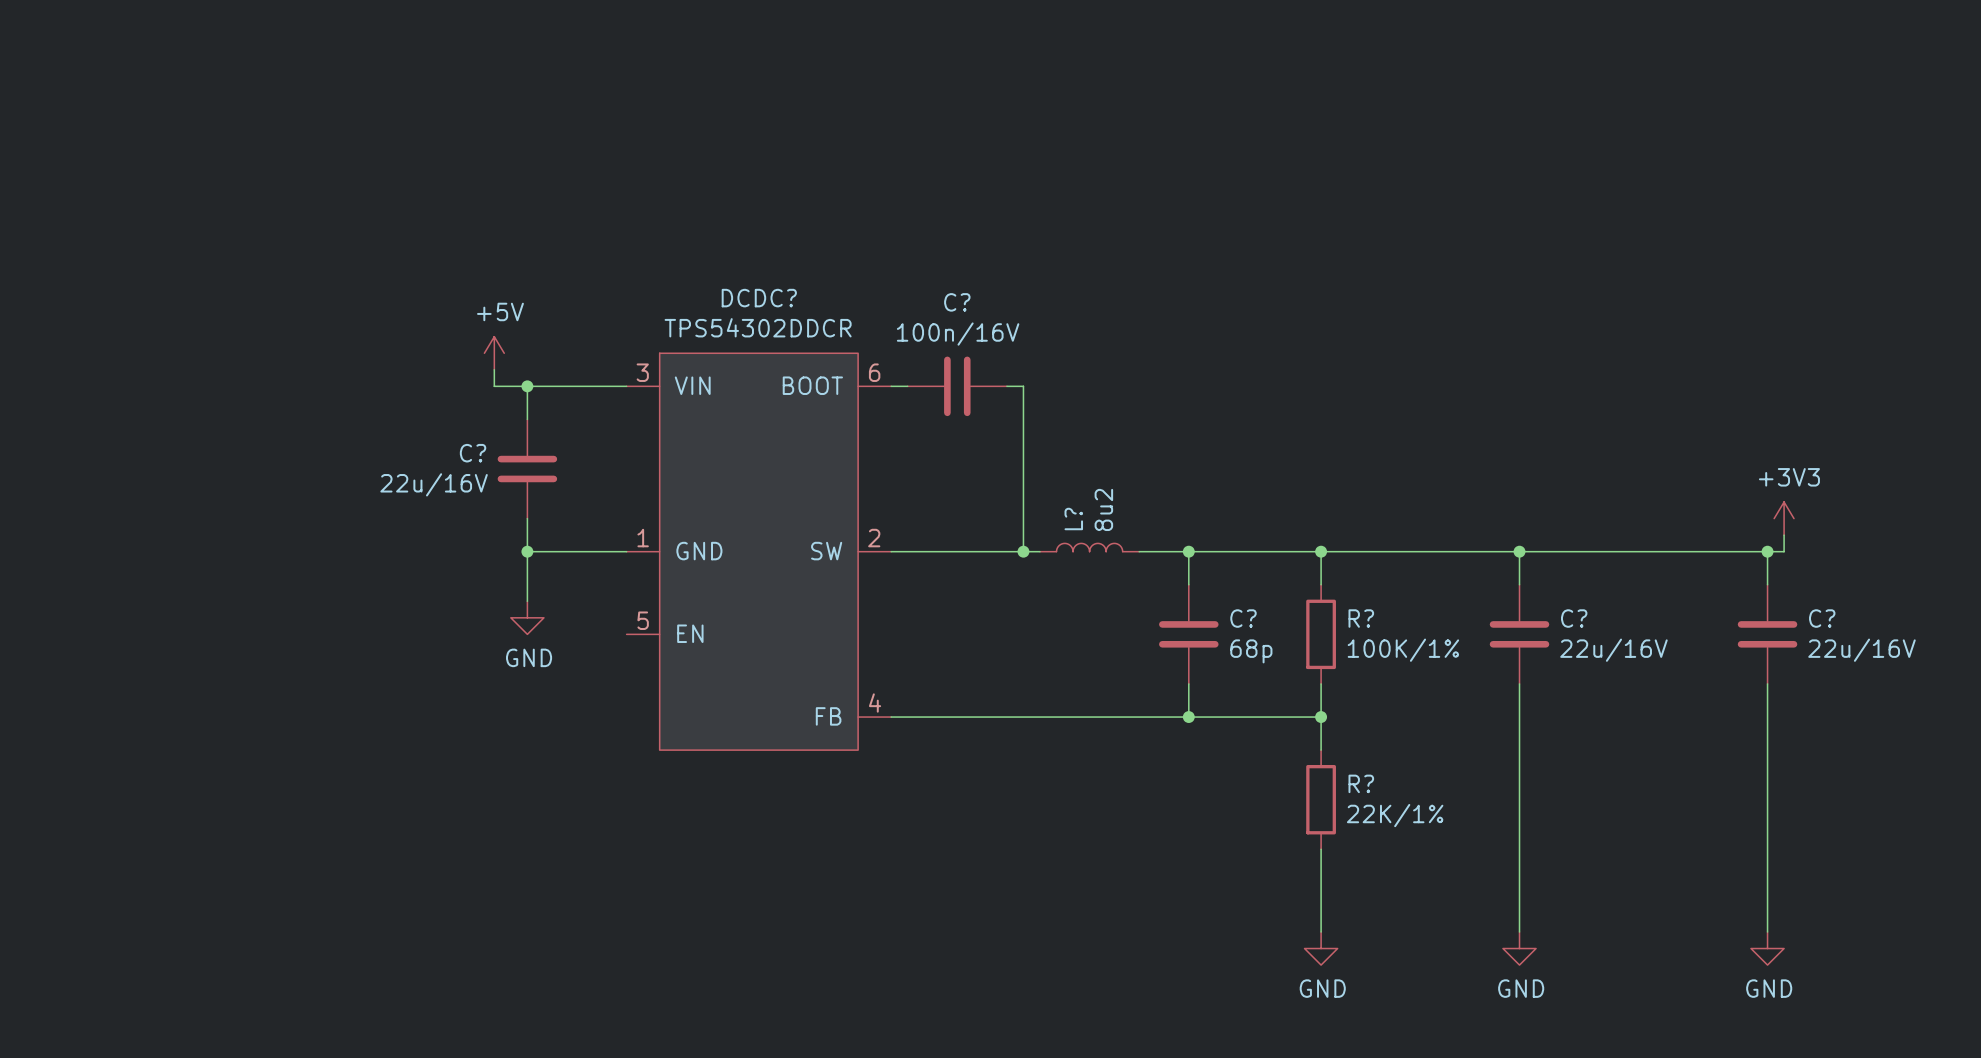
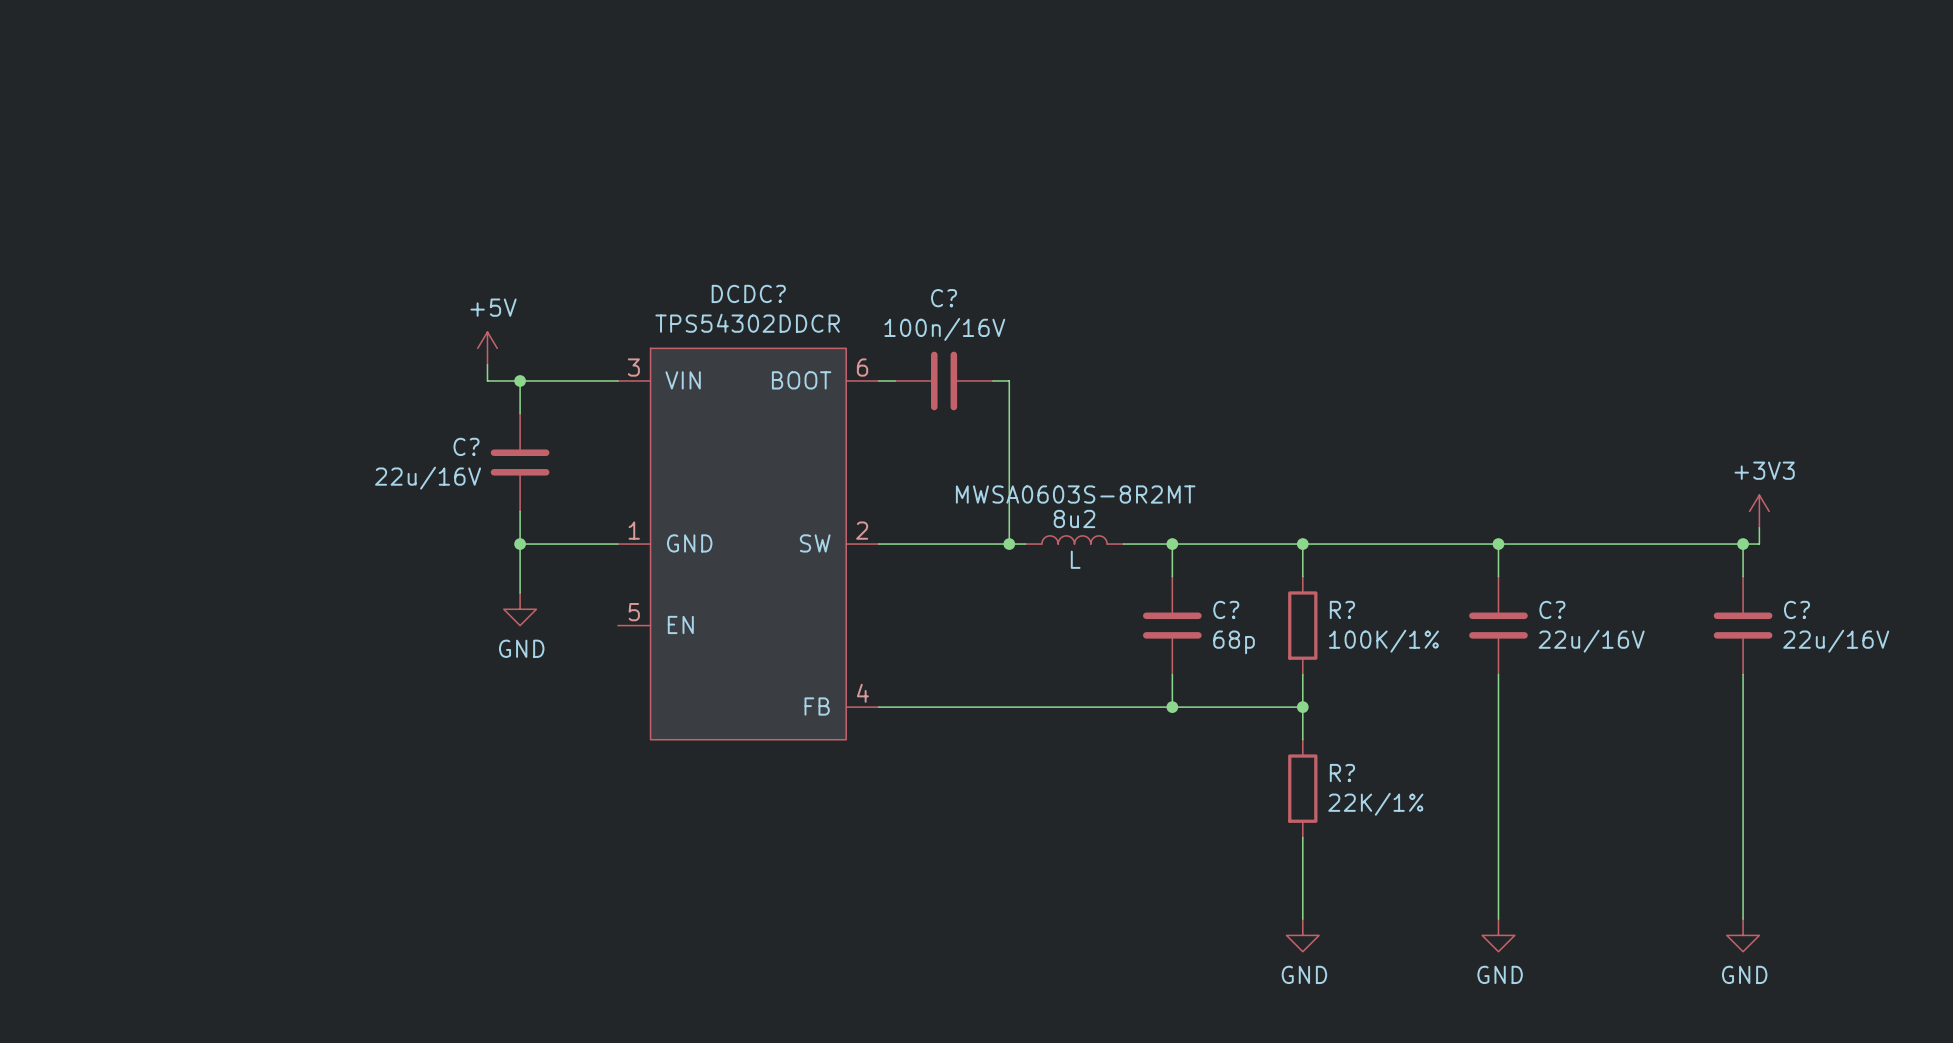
L? text: none -> MWSA0603S-8R2MT (1075, 494)
L? value rotation: 0° (1103, 509) -> 90° clockwise (1074, 518)
L? name: L? (1073, 519) -> L (1075, 559)

